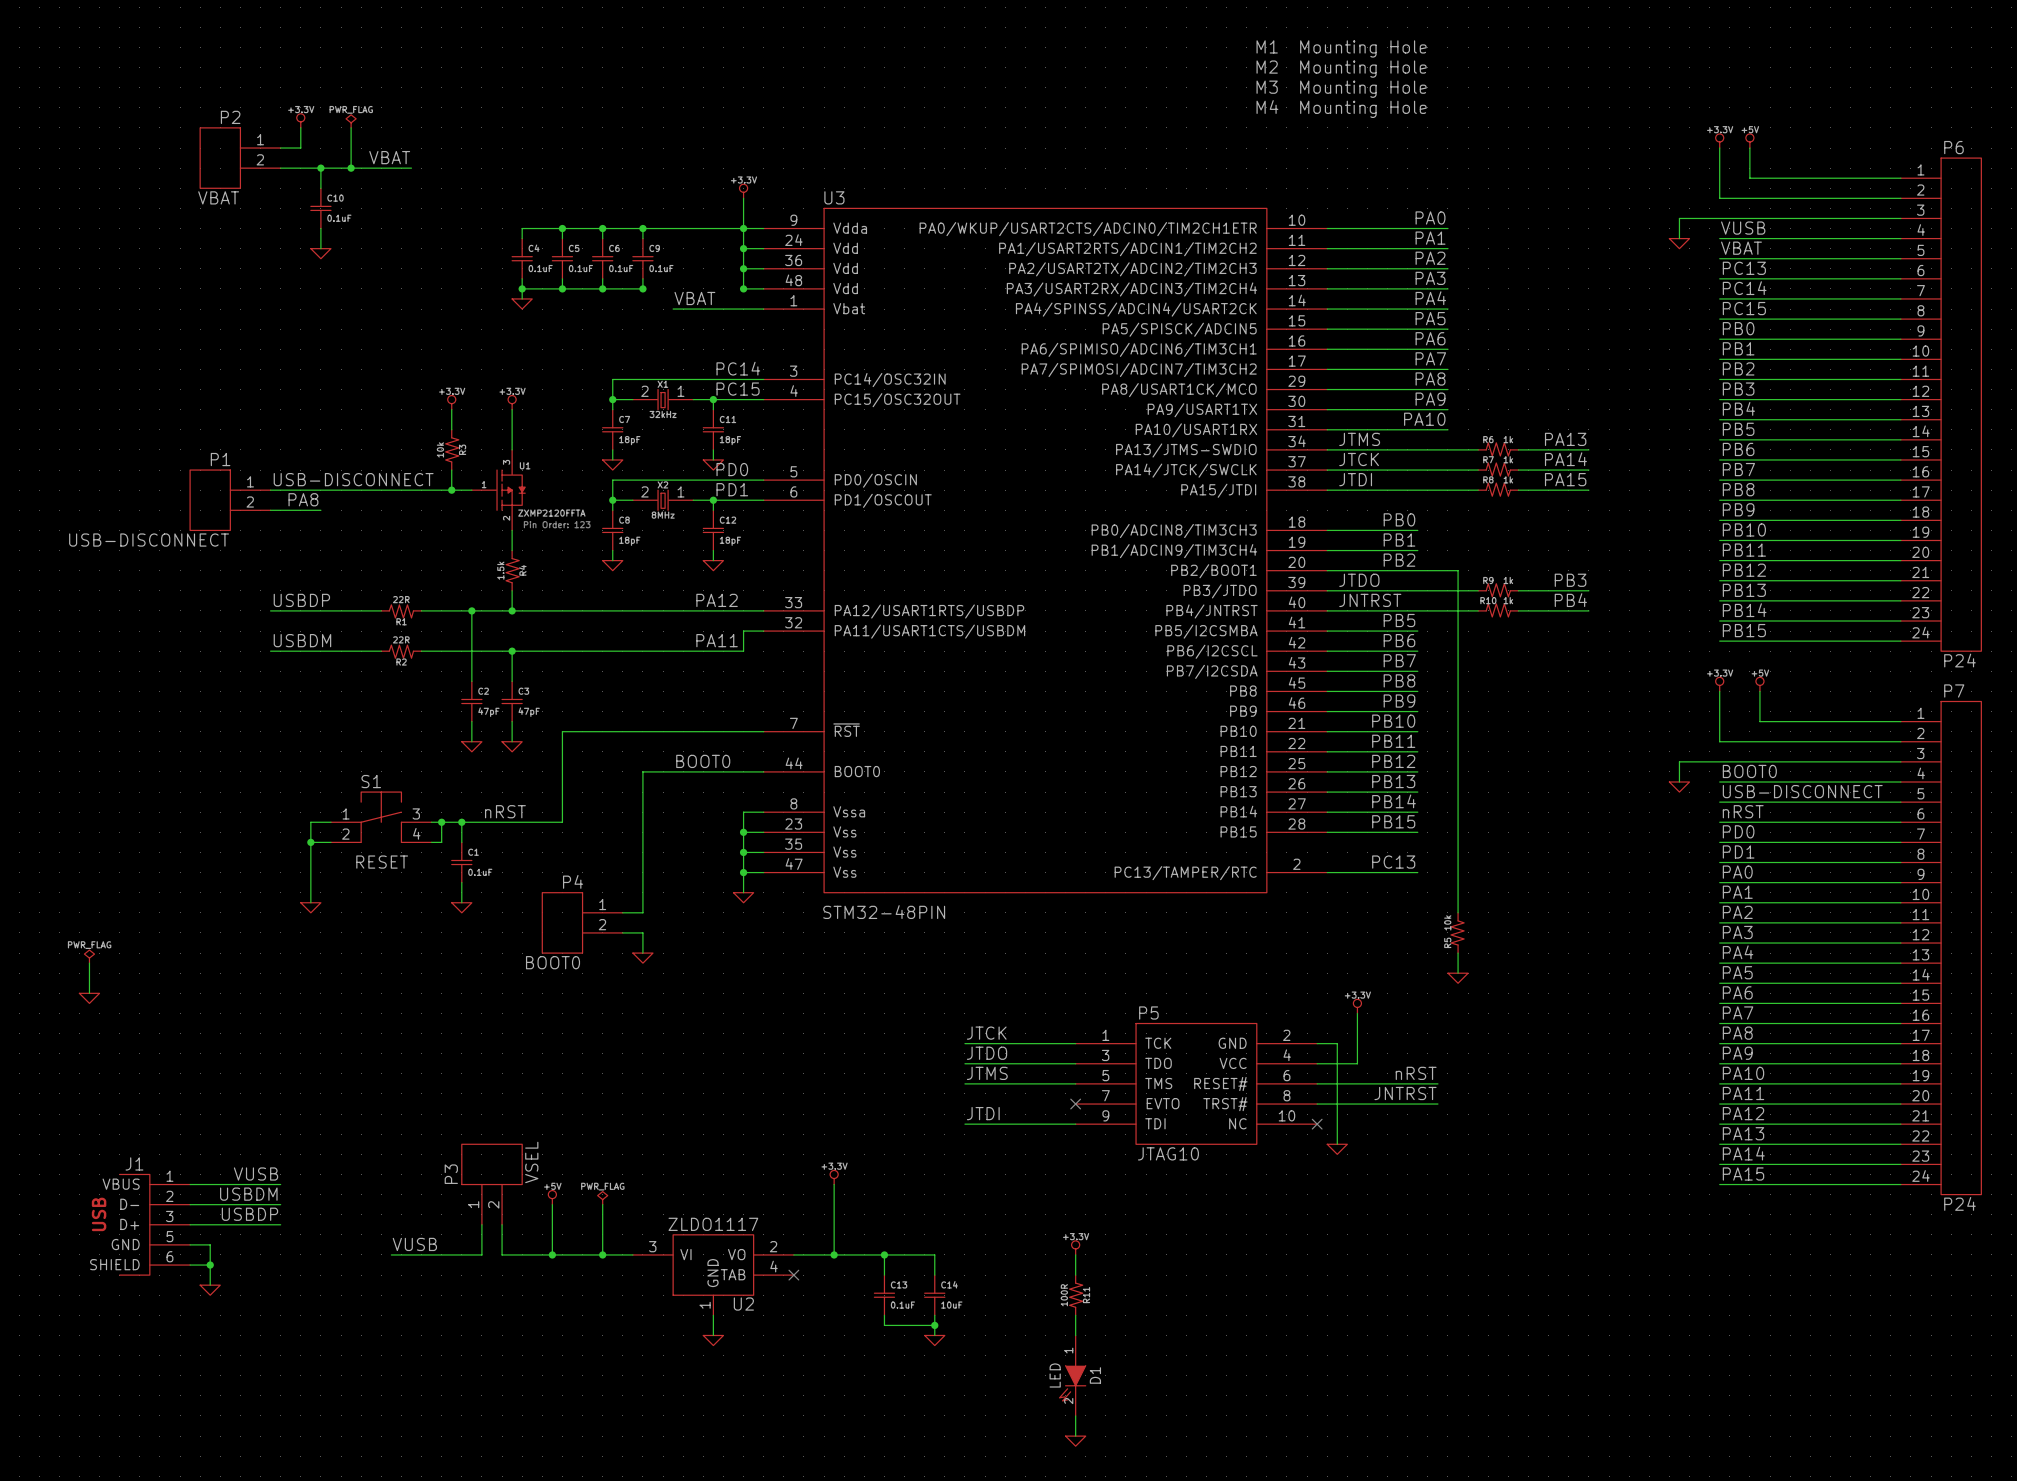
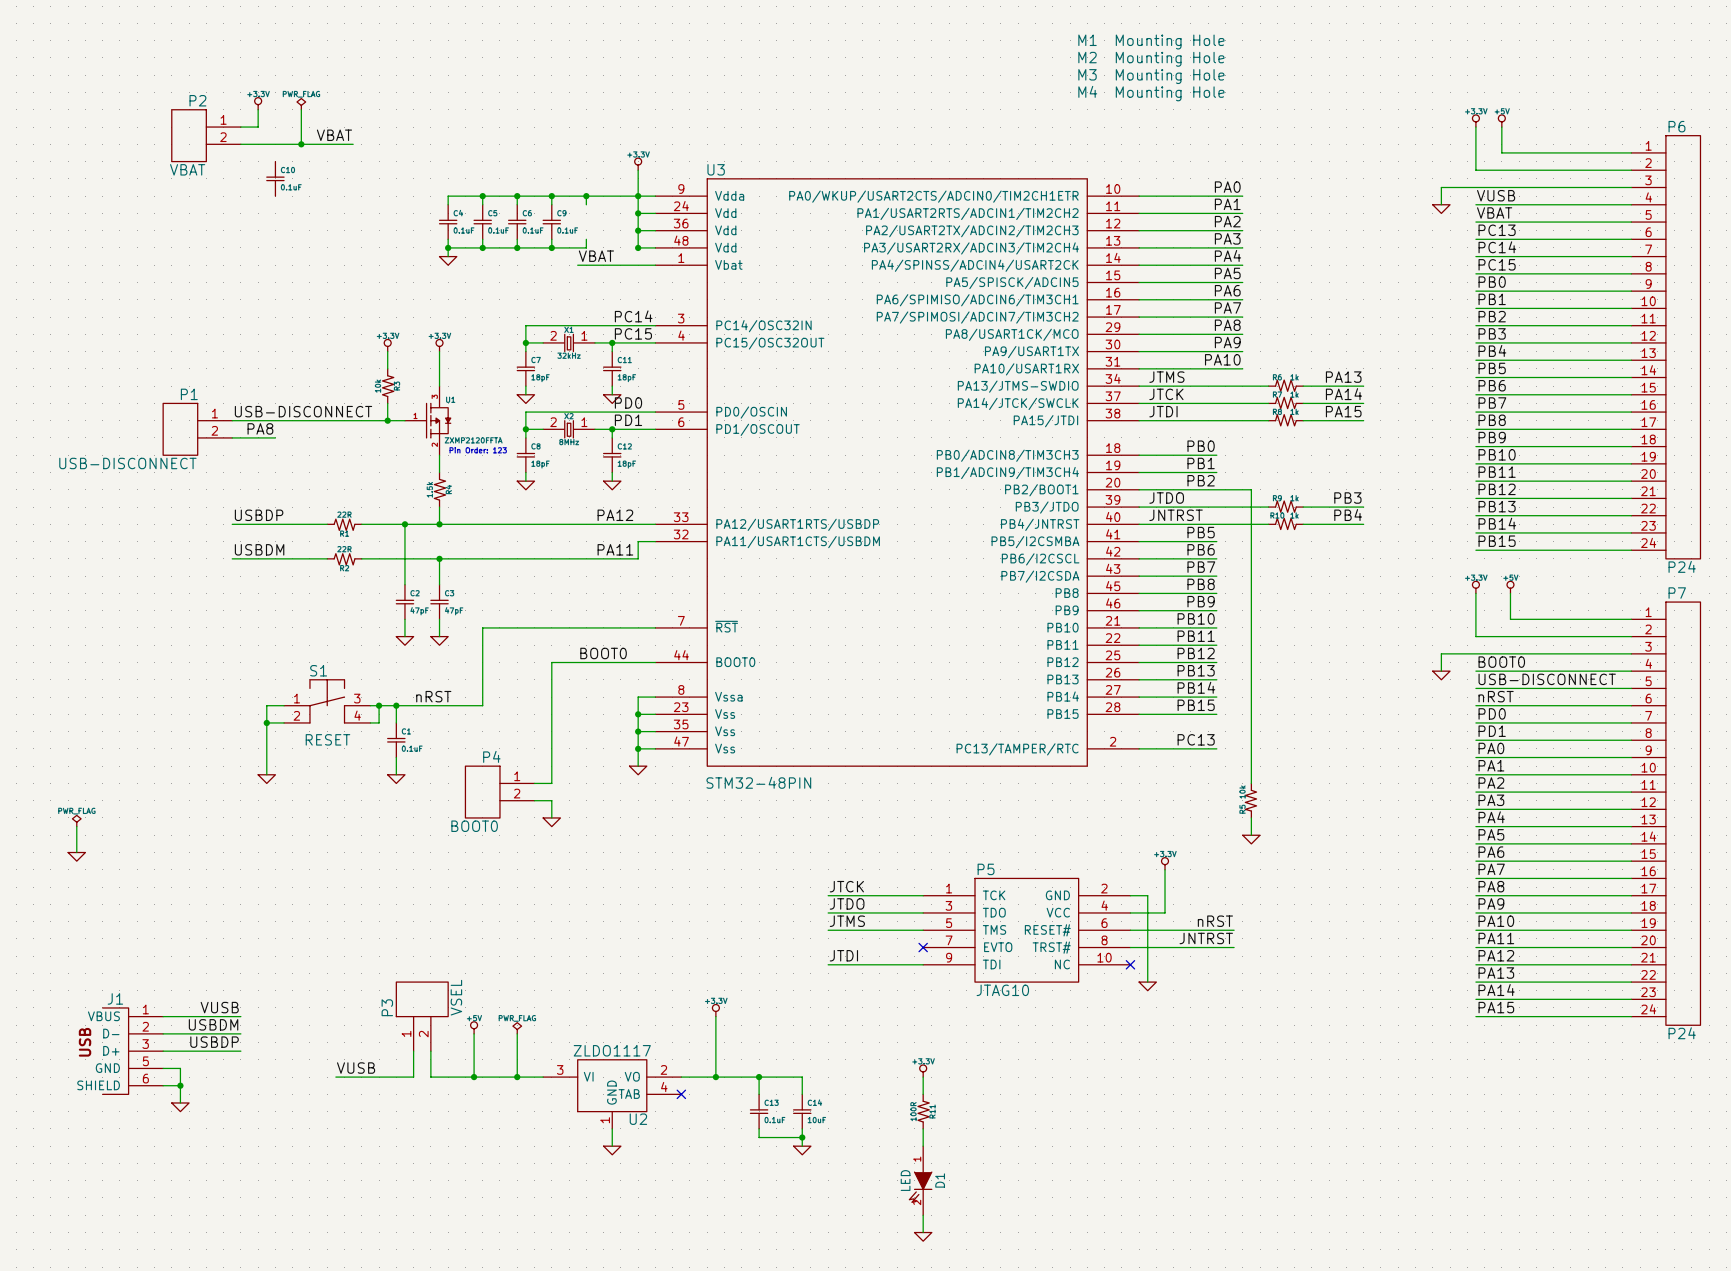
wire: (320, 168) (320, 188) -> none
junction: (320, 168) -> none
wire: (320, 228) (320, 248) -> none
wire: none -> (586, 196) (586, 204)
junction: none -> (586, 196)
power symbol: (320, 253) -> none
wire: none -> (586, 239) (586, 247) (551, 247)

